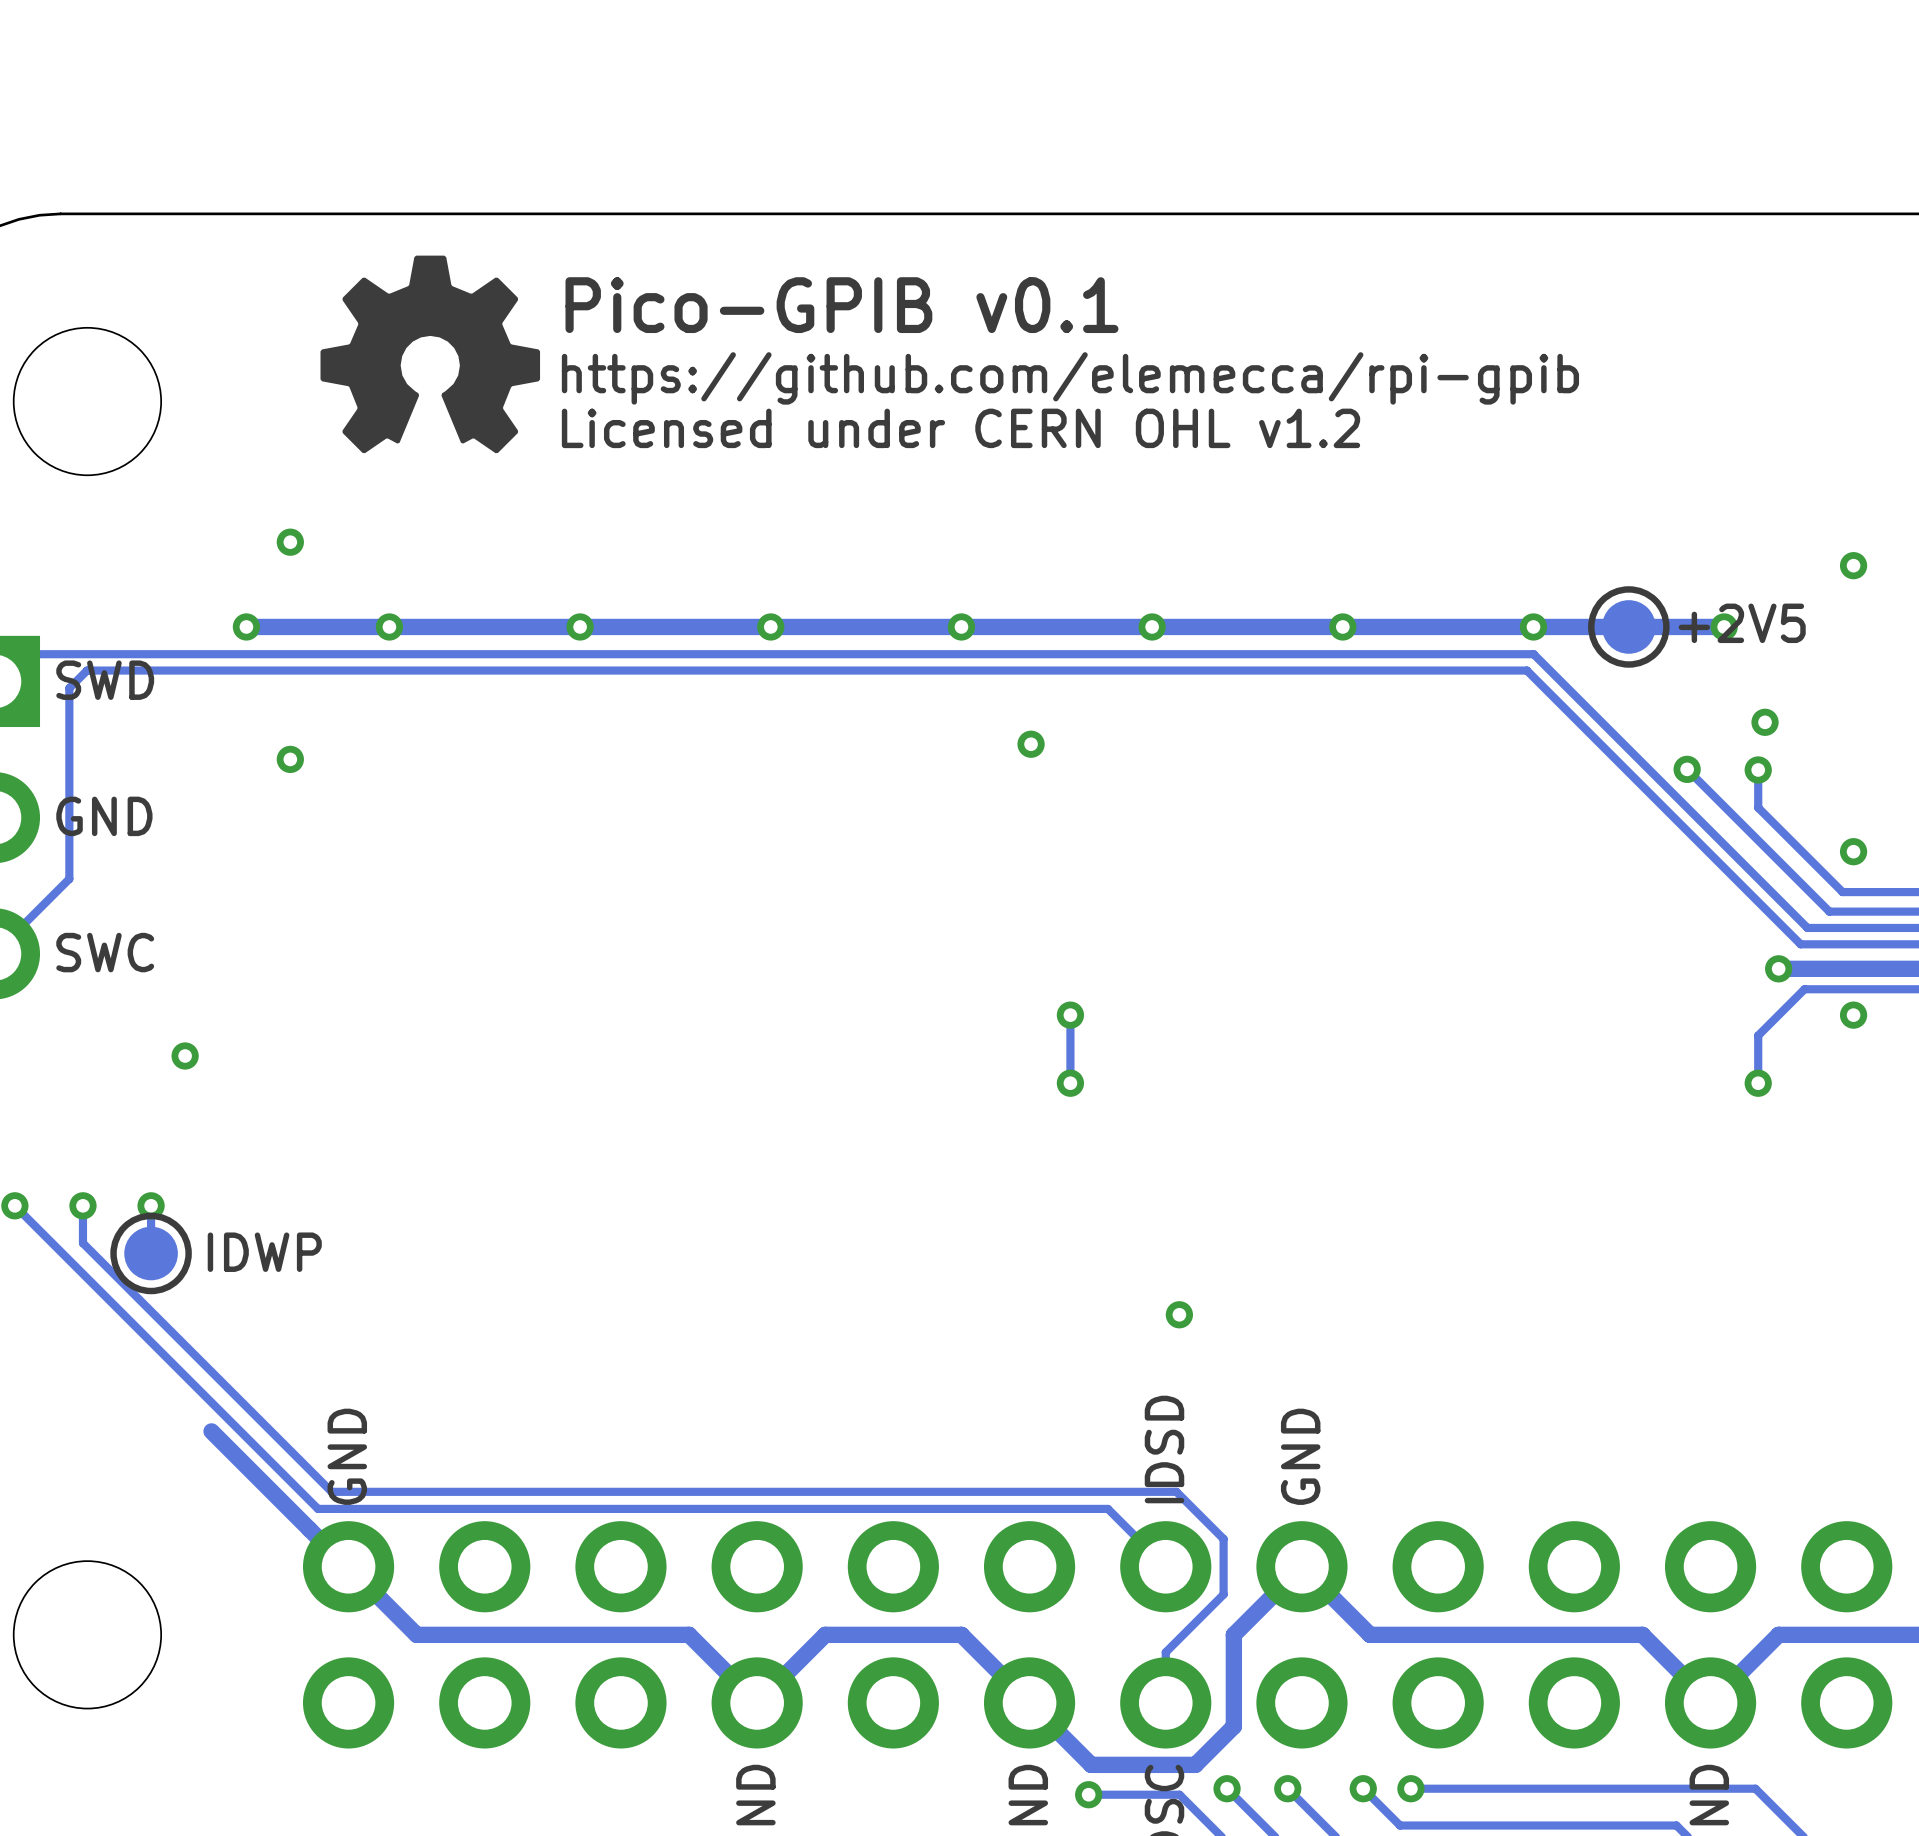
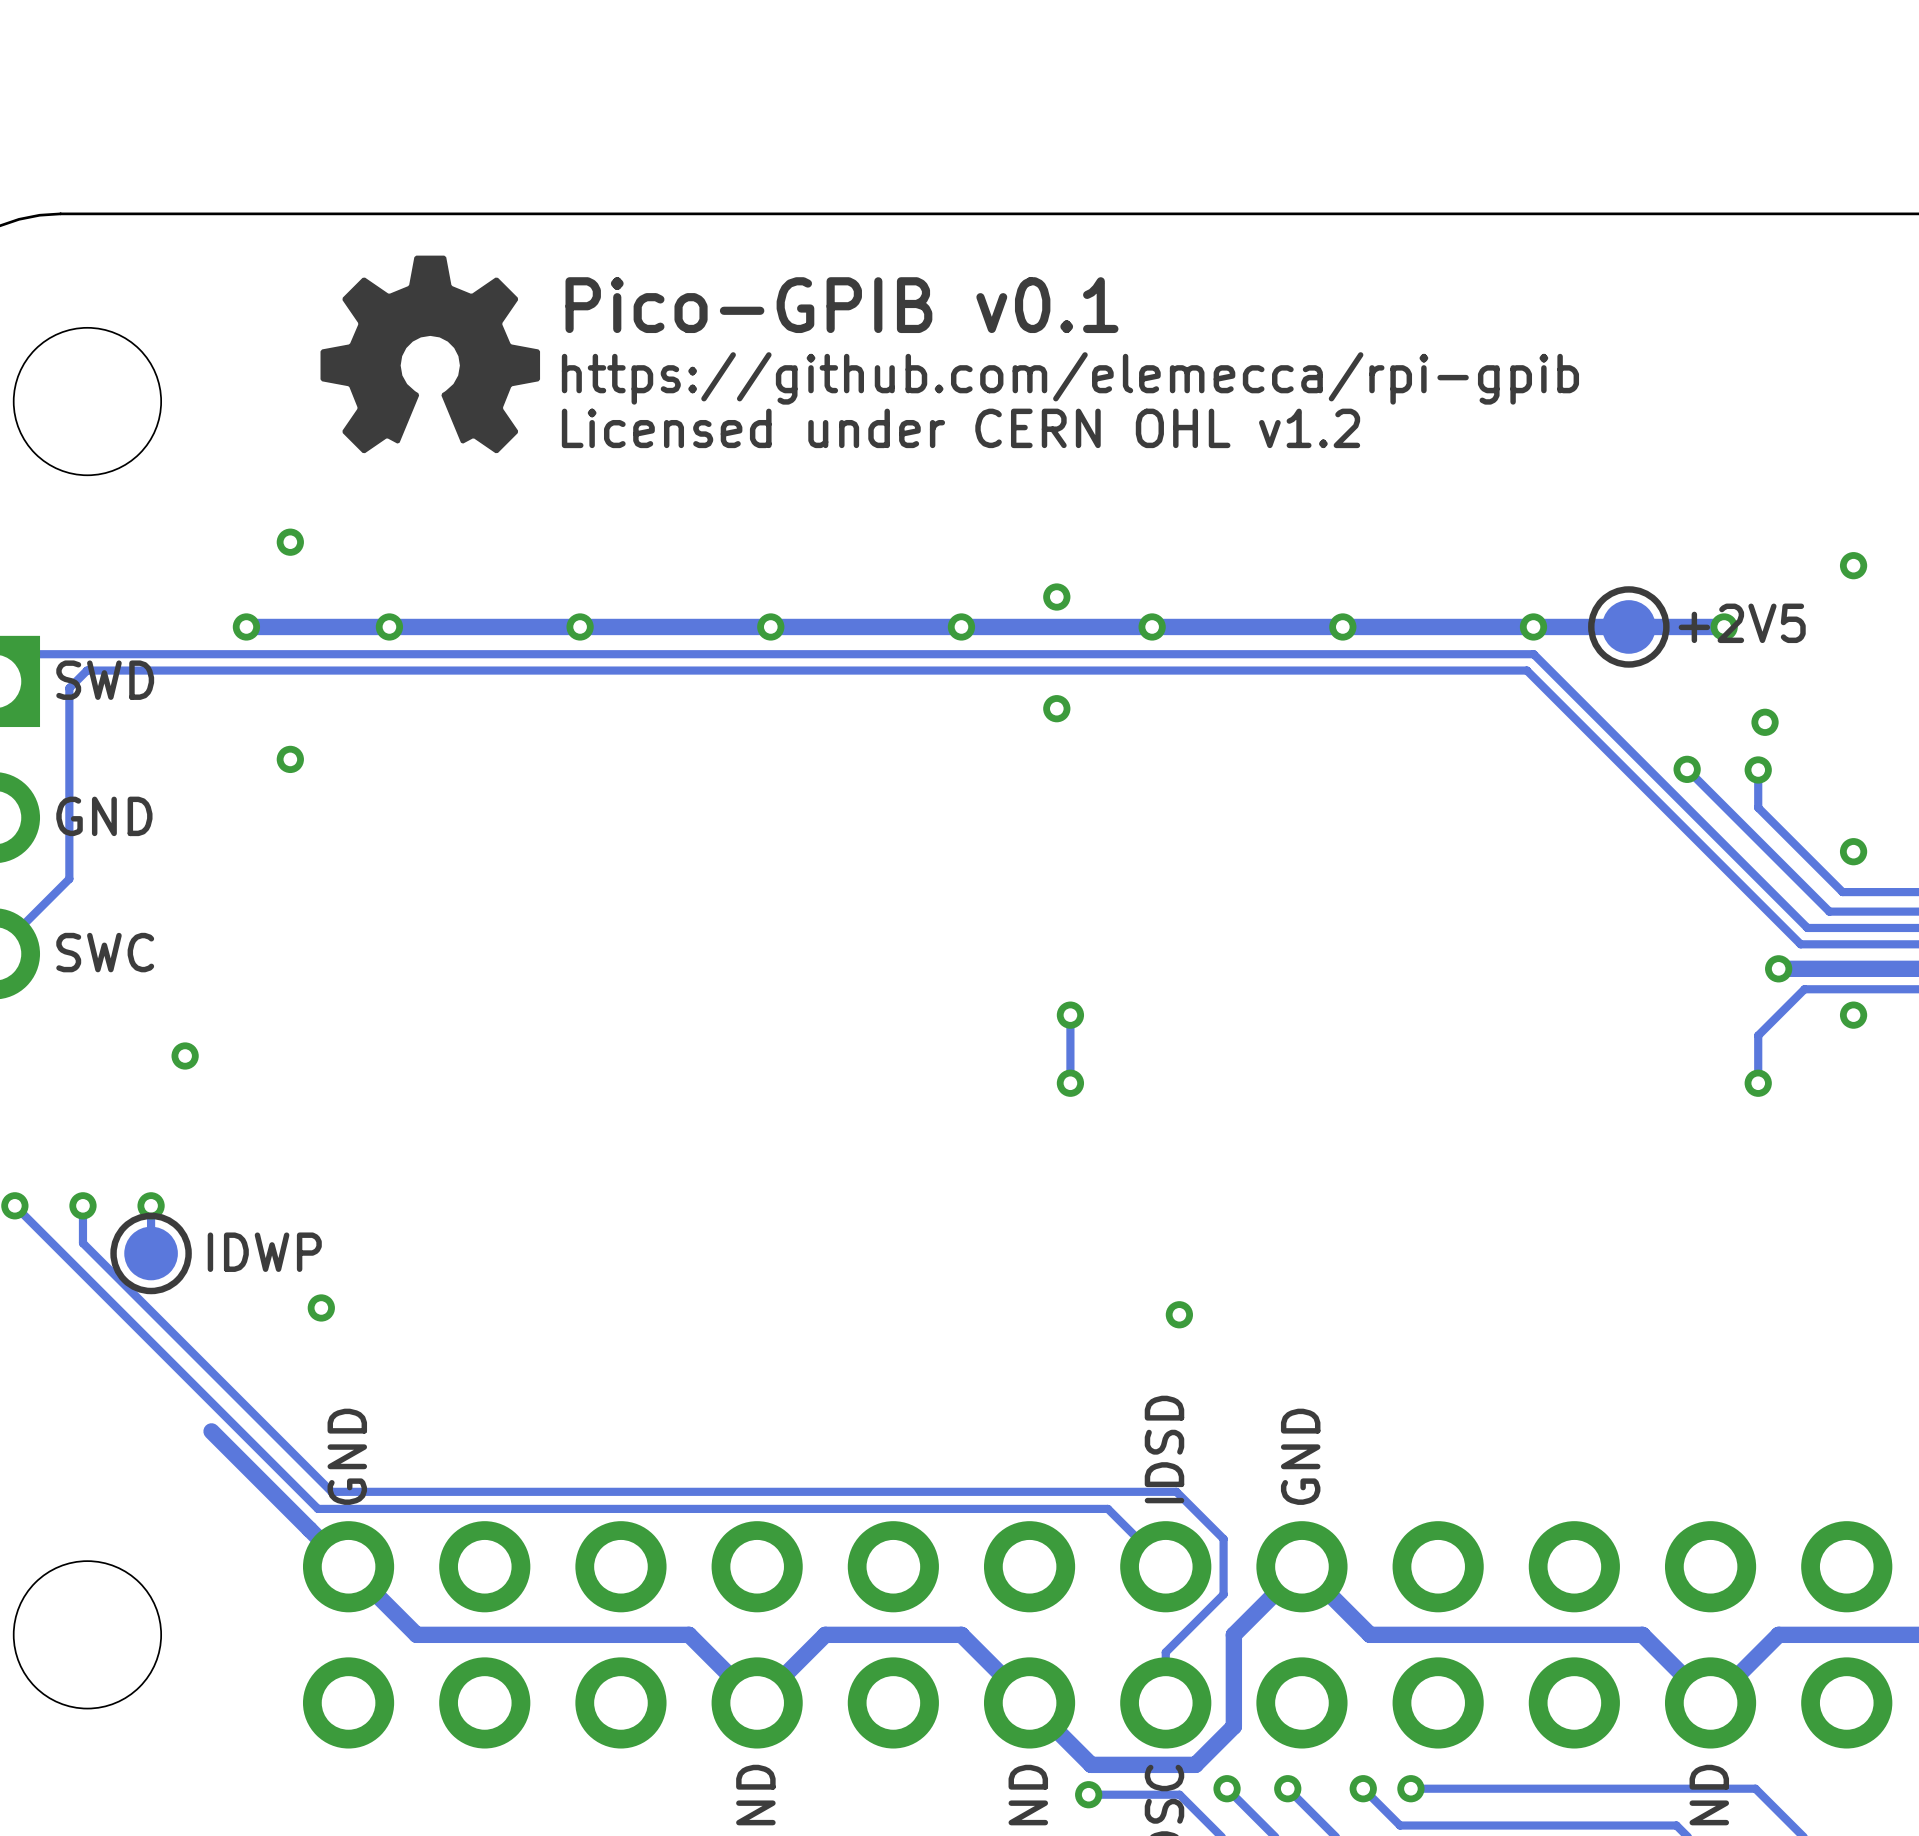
via: none -> (1056, 597)
via position: (1031, 744) -> (1056, 708)
via: none -> (321, 1307)

